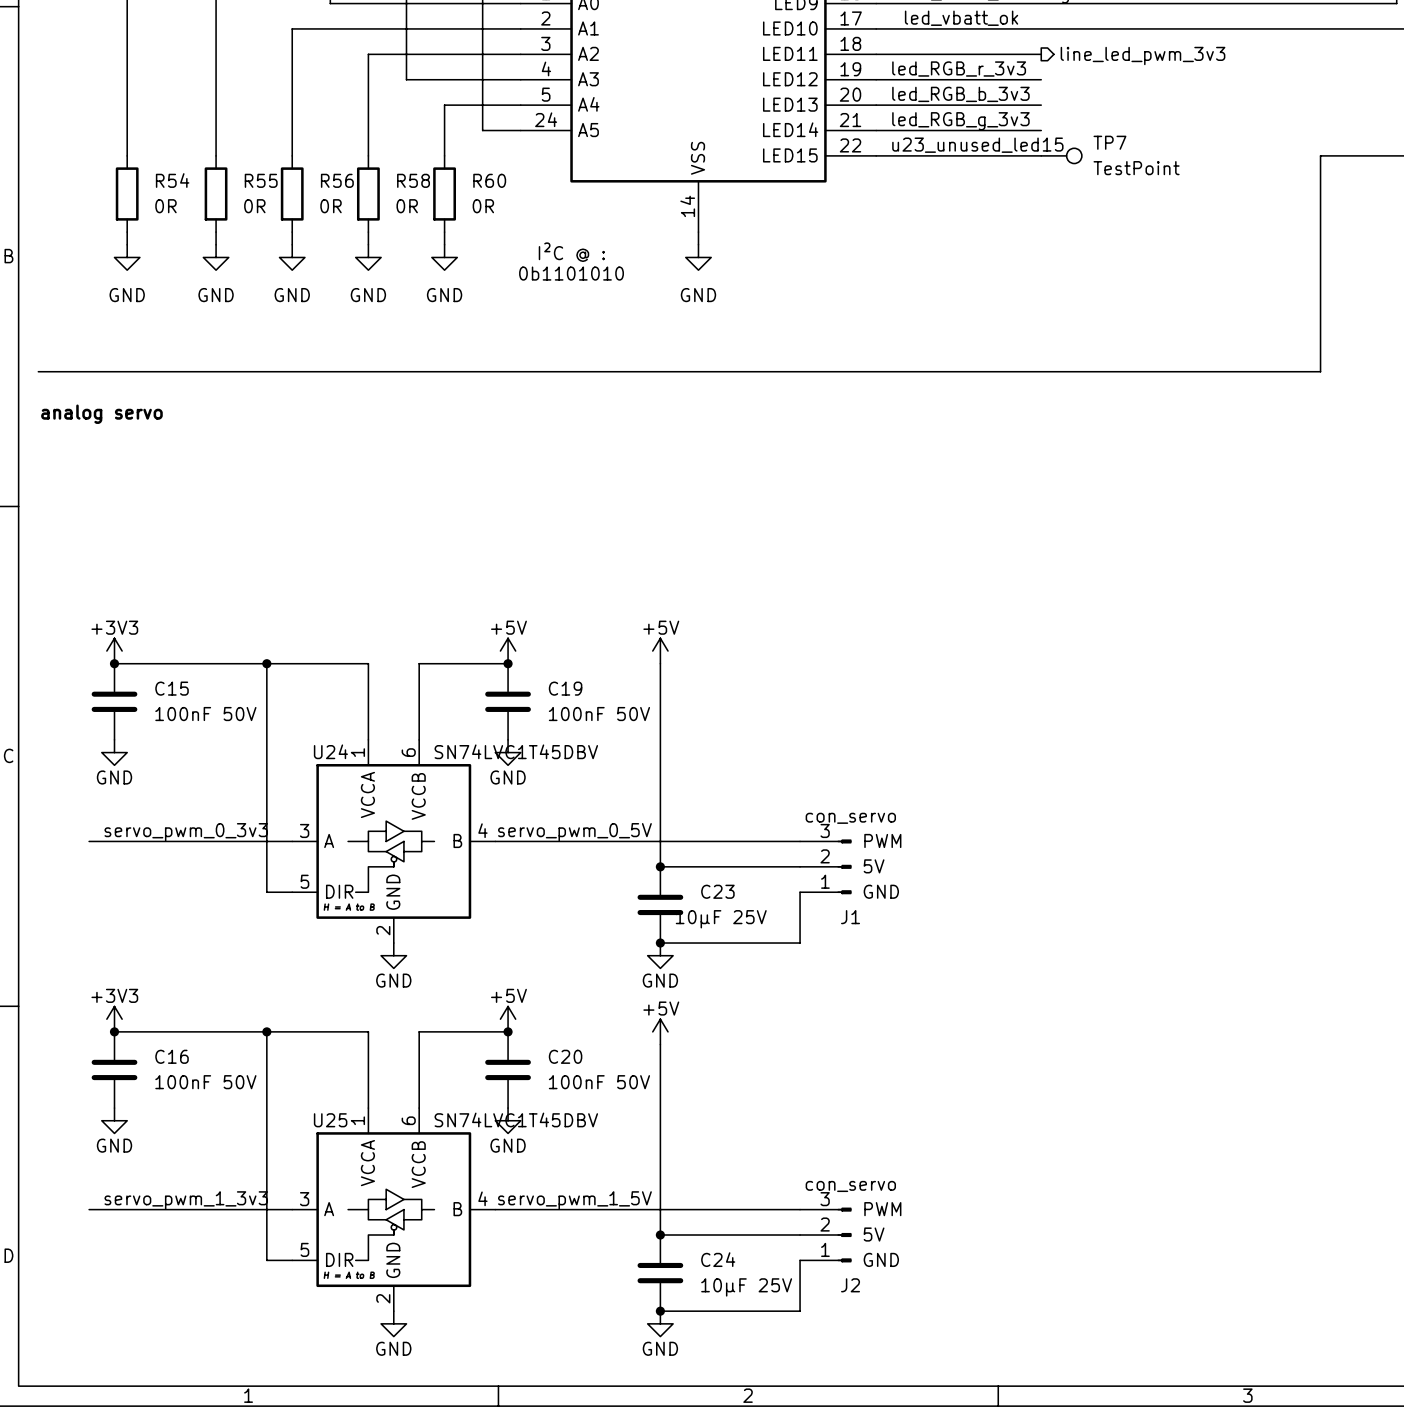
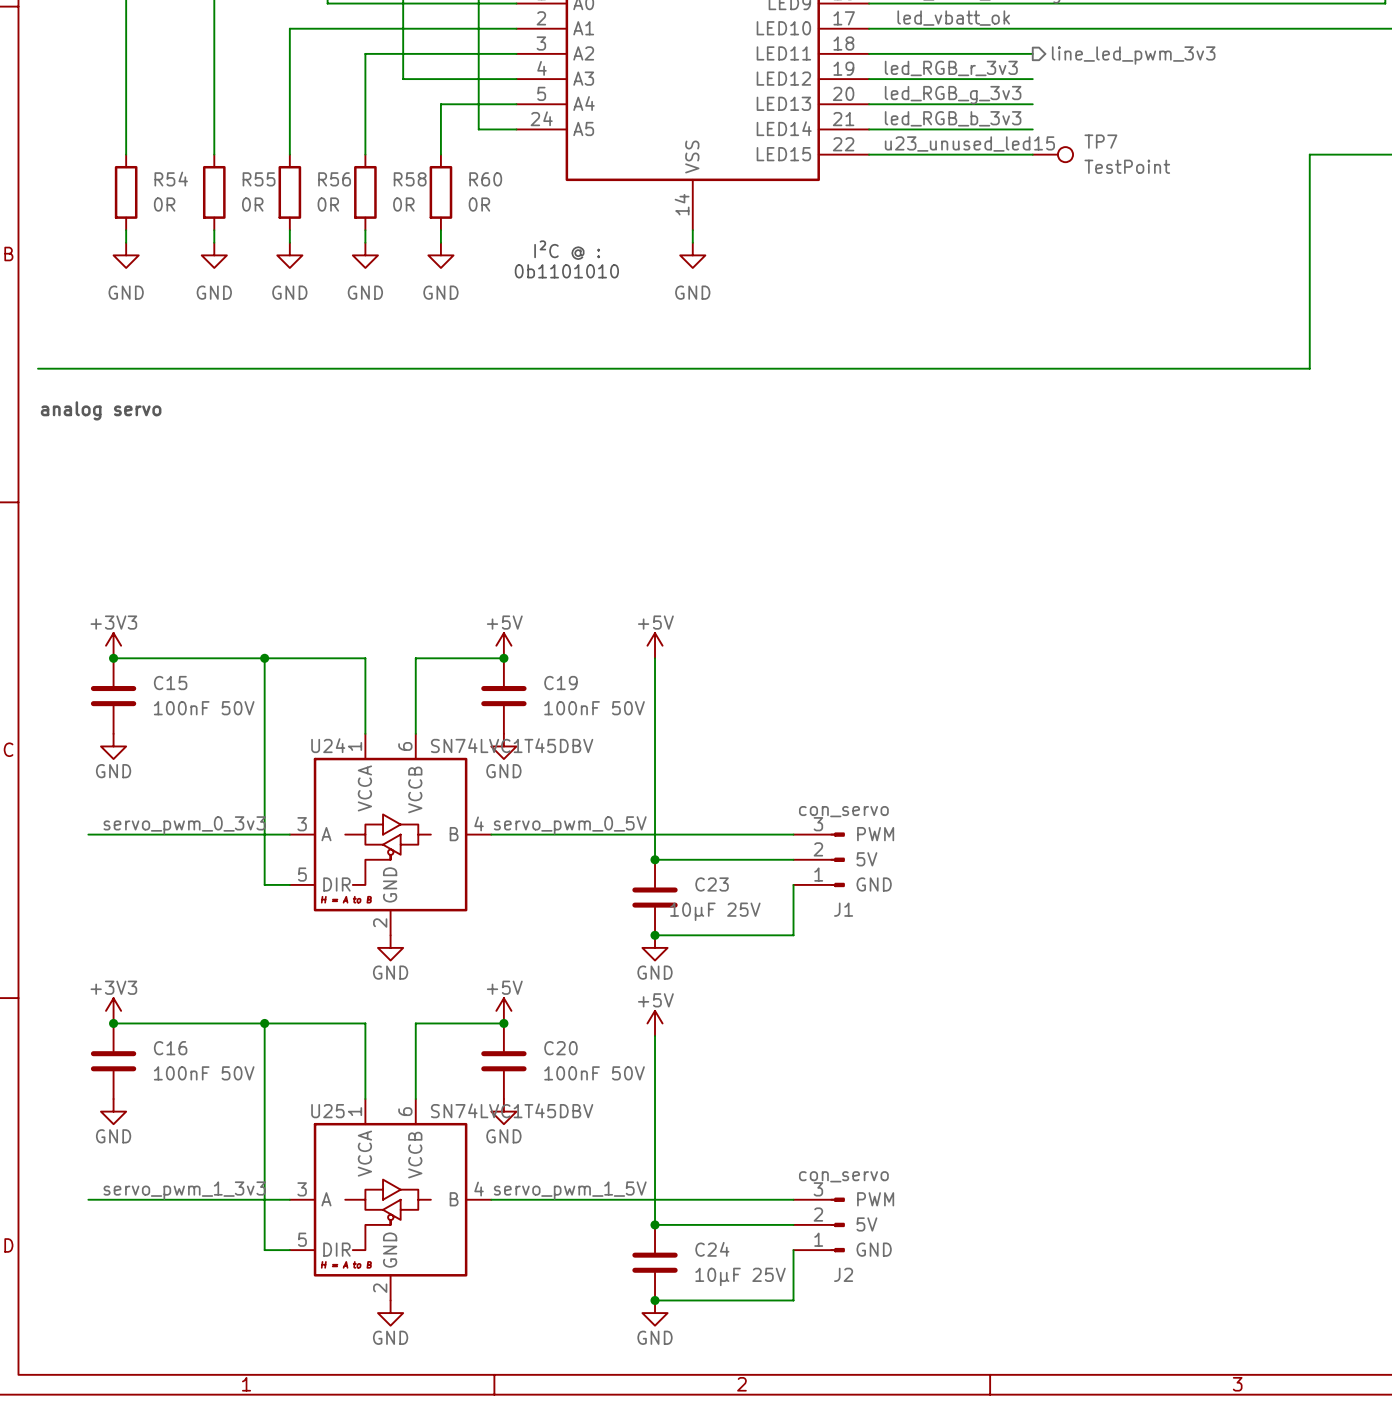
label: led_RGB_b_3v3 (960, 94) -> led_RGB_g_3v3 (953, 95)
label: led_RGB_g_3v3 (960, 121) -> led_RGB_b_3v3 (953, 118)

